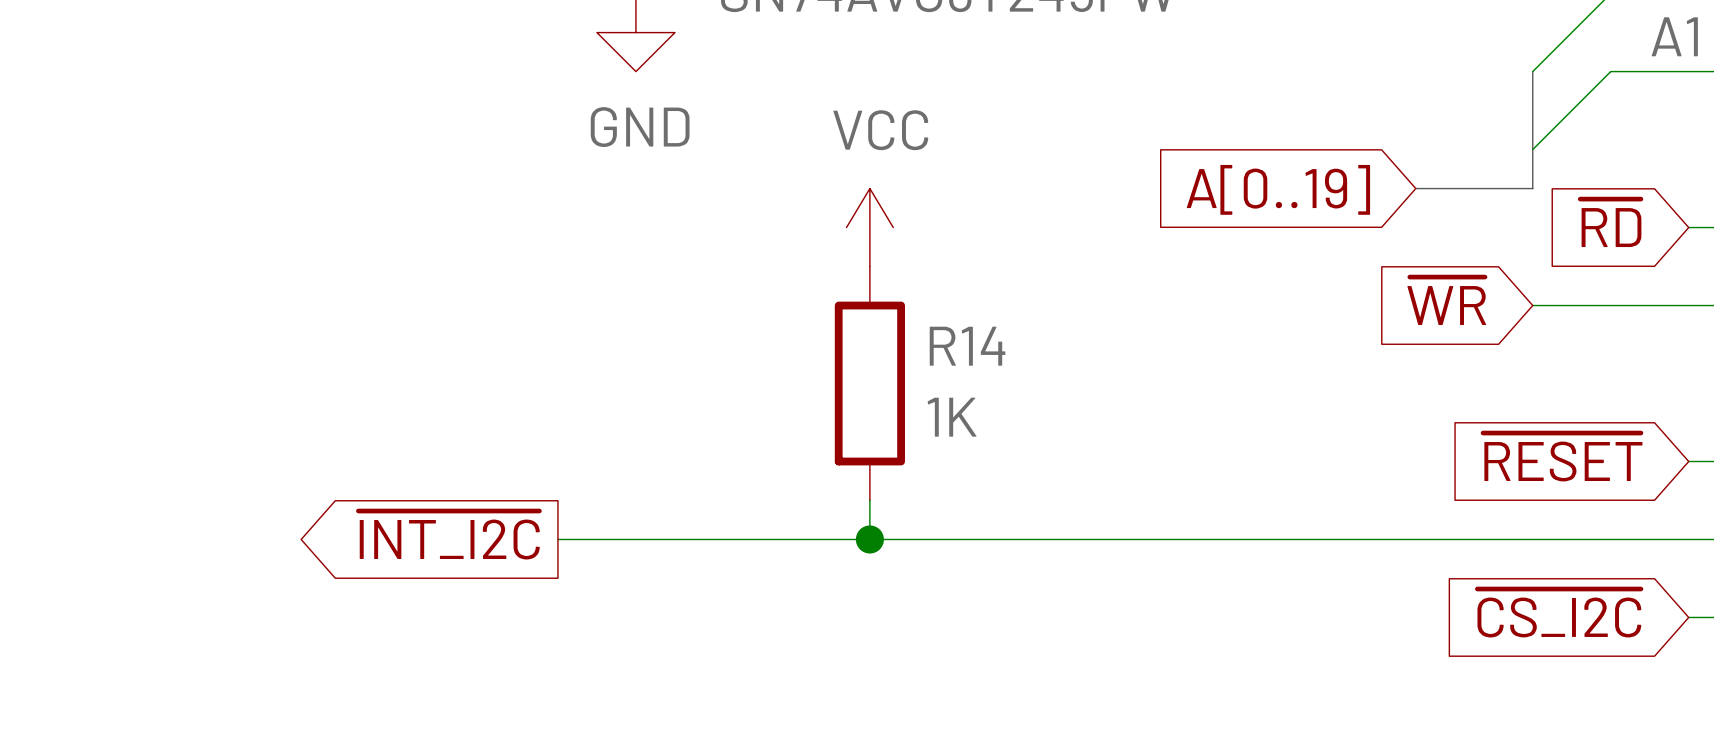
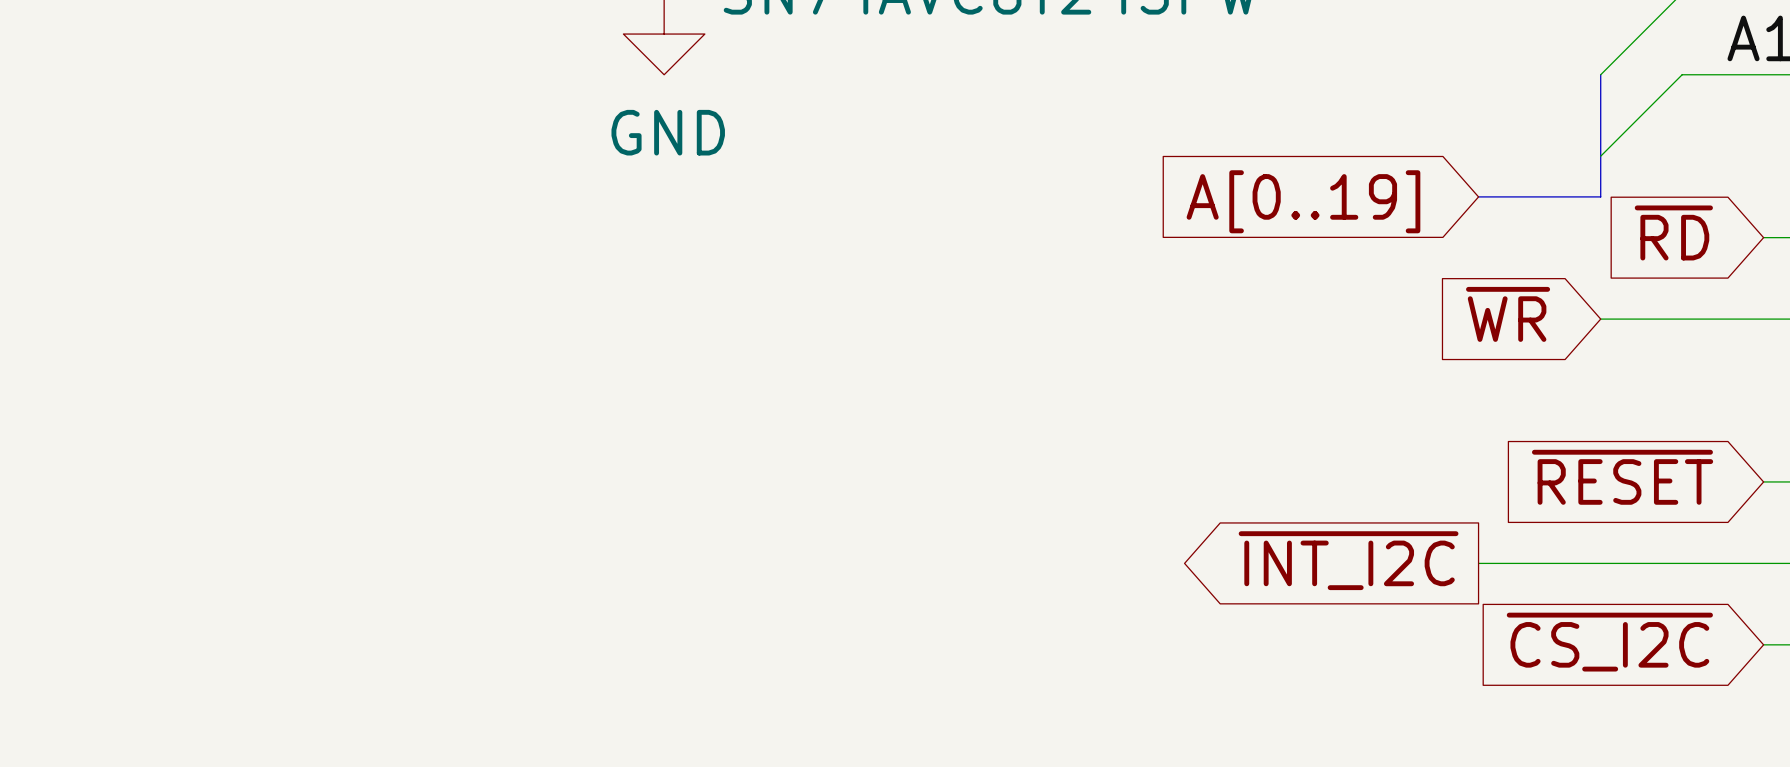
power symbol: VCC (869, 227) -> none
R14: 1K (869, 383) -> none
wire: (869, 500) (869, 539) -> none
global label: ~{INT_I2C} (449, 535) -> none
global label: none -> ~{INT_I2C} (1348, 560)
wire: (557, 539) (1415, 539) -> none
junction: (869, 539) -> none

